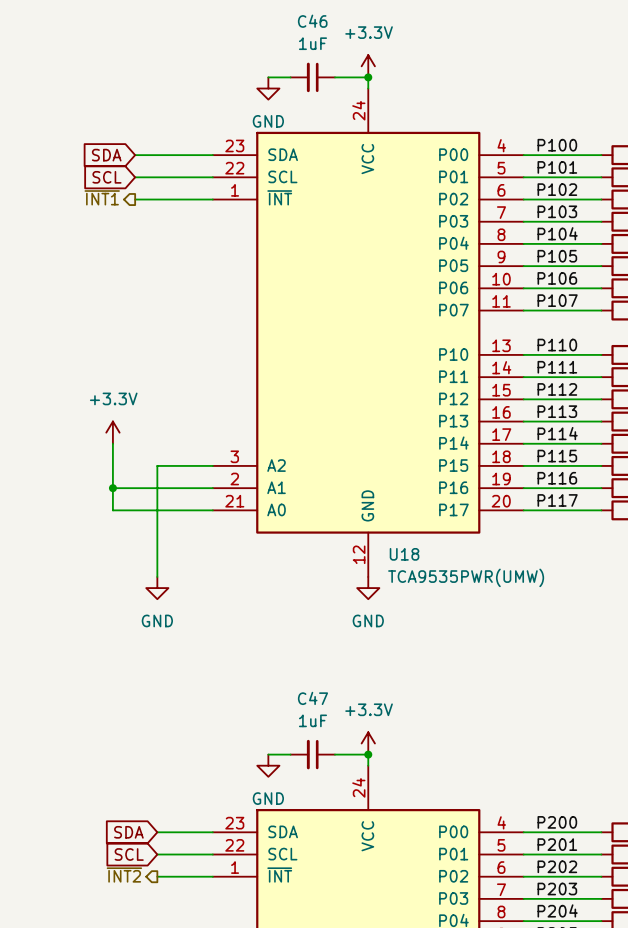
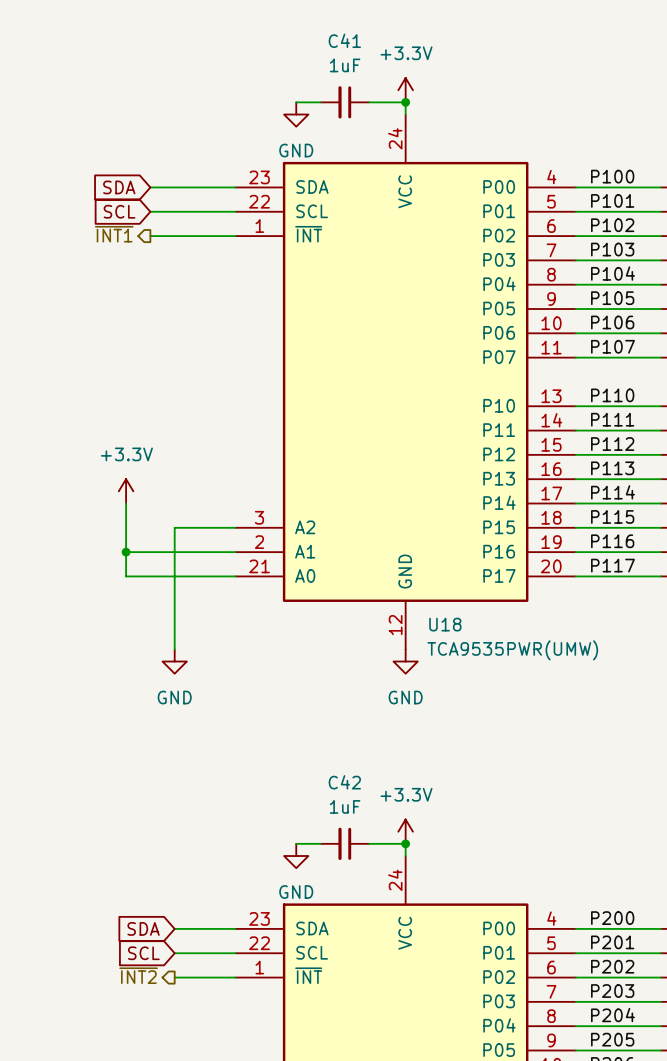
C46 name: C46 (312, 21) -> C41 (344, 40)
C47 name: C47 (312, 698) -> C42 (344, 782)

